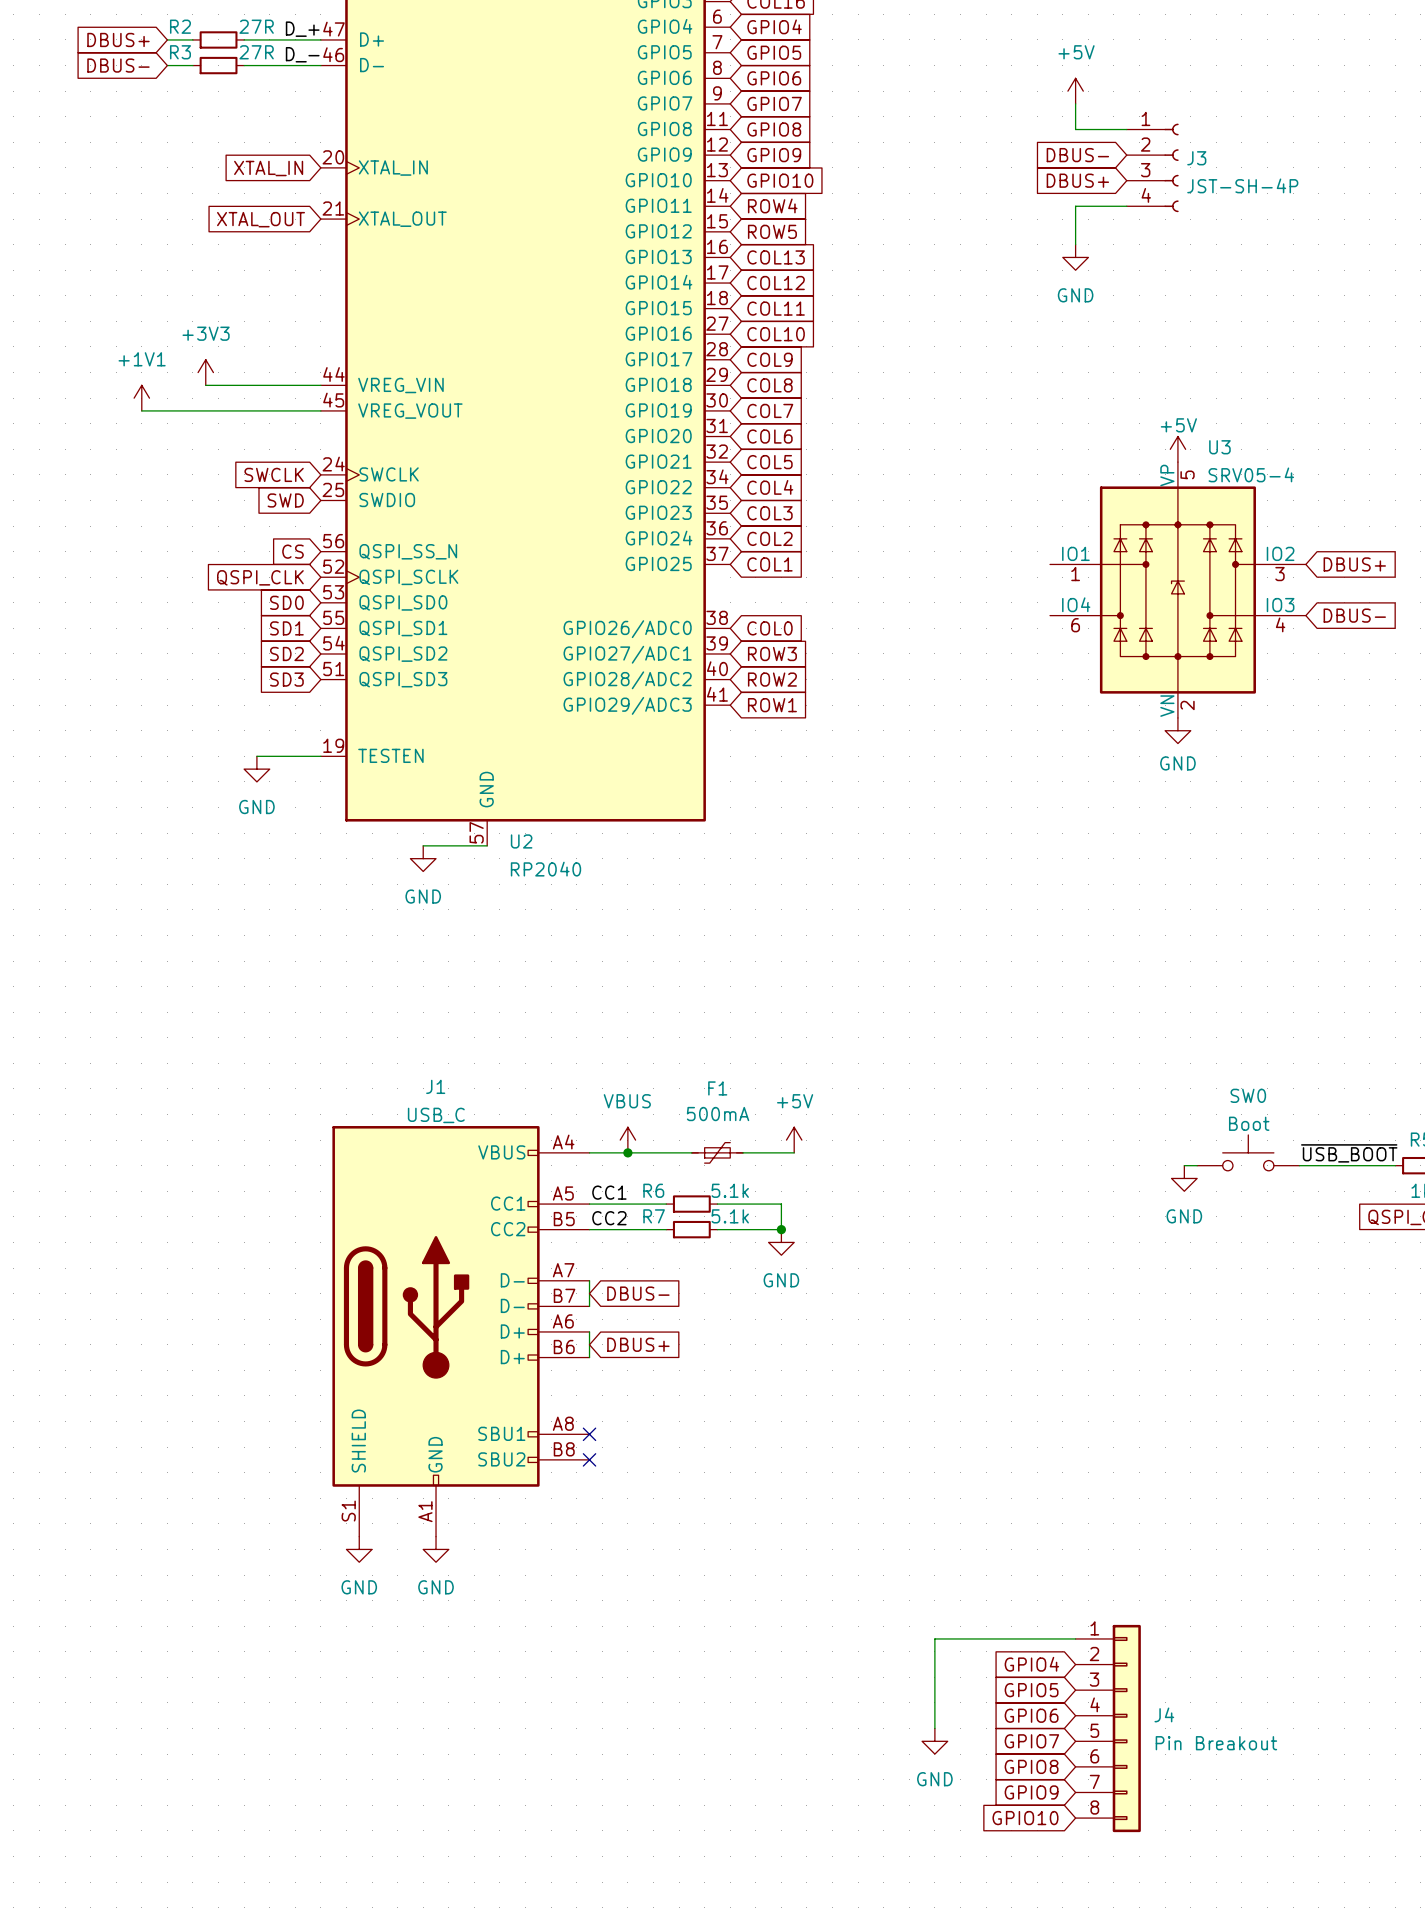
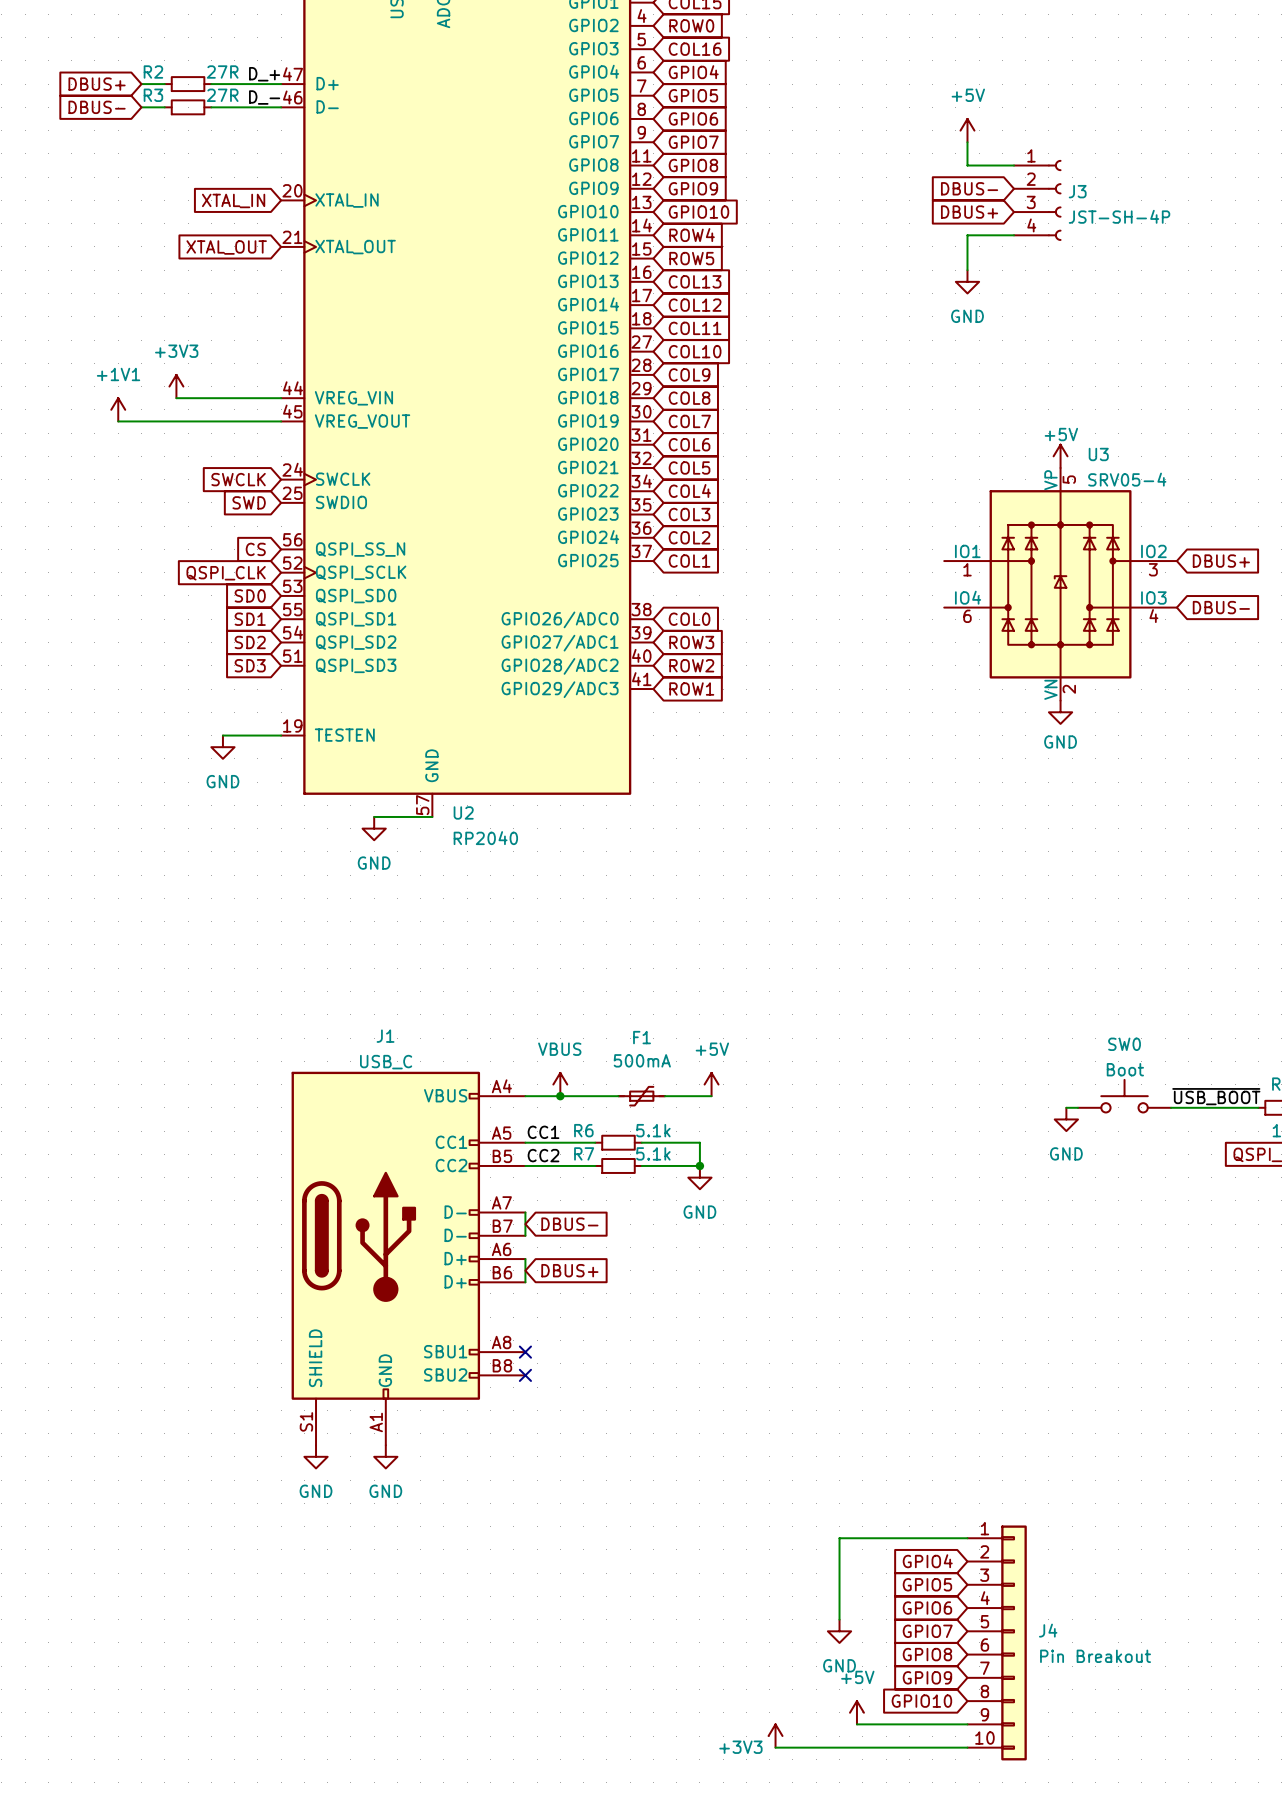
J4 symbol: [1075, 1624, 1141, 1833] -> [967, 1525, 1027, 1761]
power symbol: none -> +5V (856, 1712)
wire: none -> (856, 1724) (967, 1724)
power symbol: none -> +3V3 (775, 1736)
wire: none -> (775, 1747) (967, 1747)

